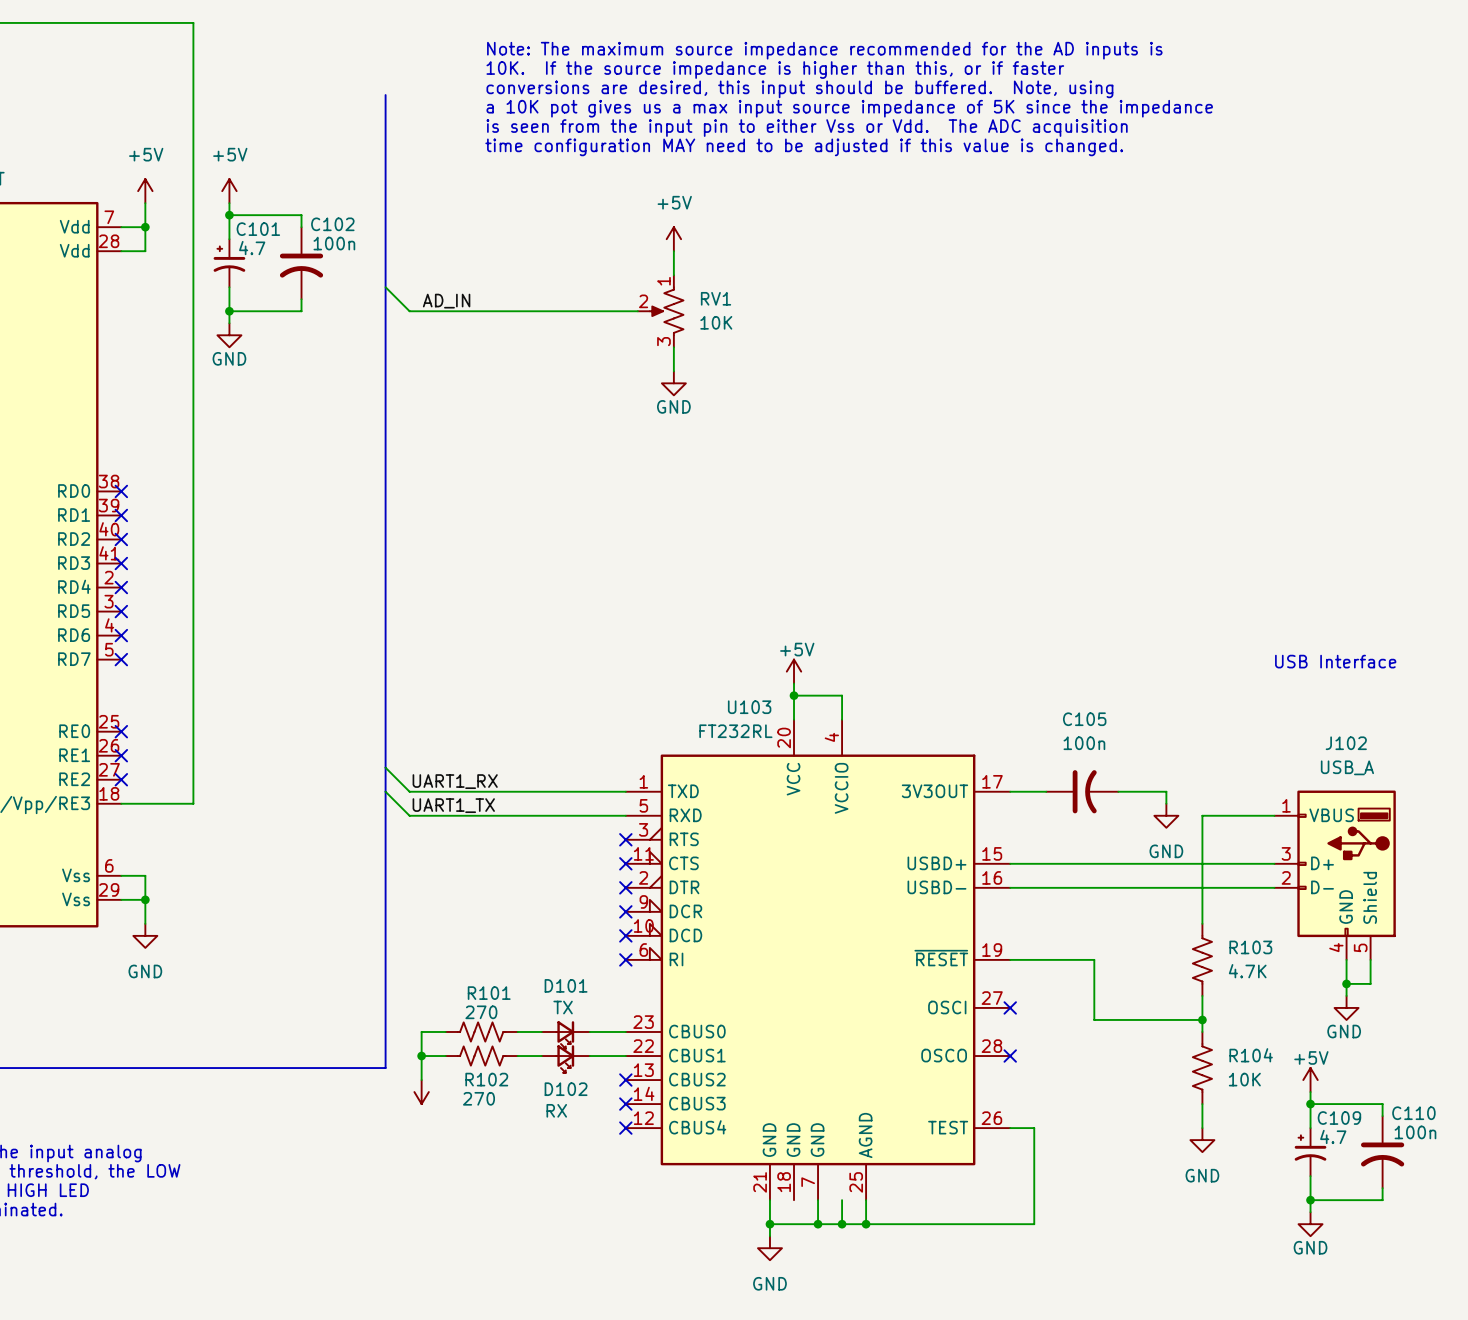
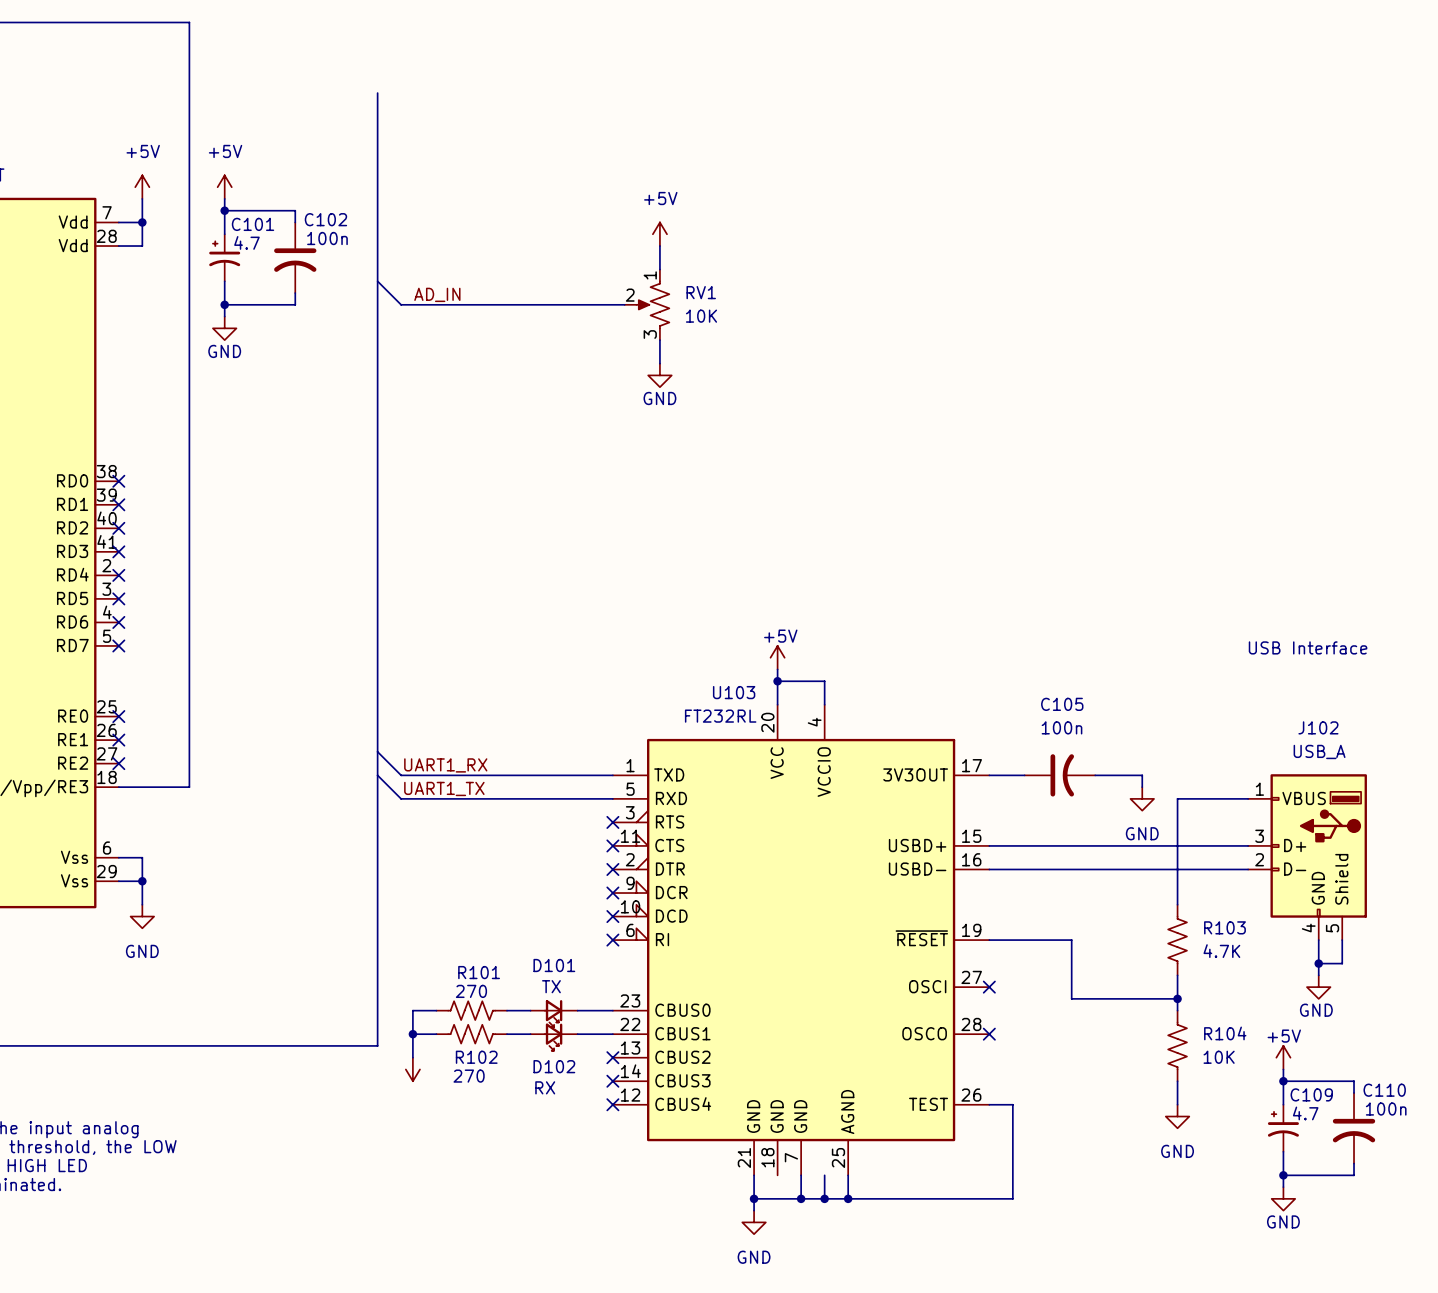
text: Note: The maximum source impedance recommended for the AD inputs is (824, 50) -> none
text: 10K. If the source impedance is higher than this, or if faster (775, 70) -> none
text: conversions are desired, this input should be buffered. Note, using (799, 89) -> none
text: a 10K pot gives us a max input source impedance of 5K since the impedance (849, 108) -> none
text: is seen from the input pin to either Vss or Vdd. The ADC acquisition (807, 128) -> none
text: time configuration MAY need to be adjusted if this value is changed. (804, 147) -> none

